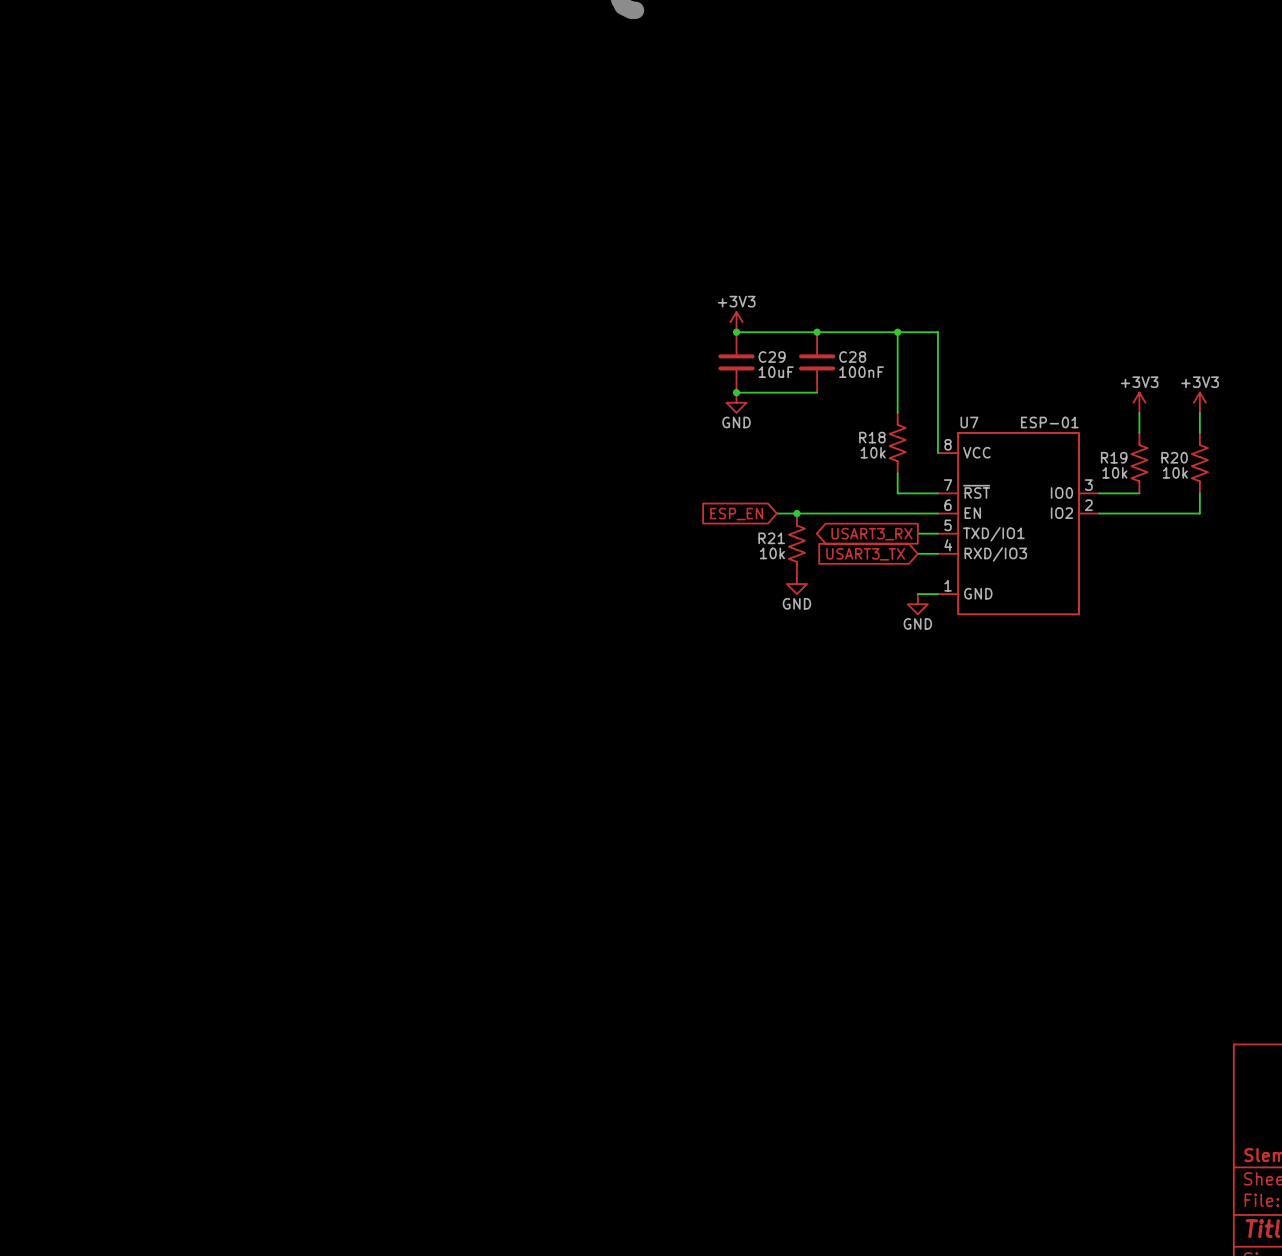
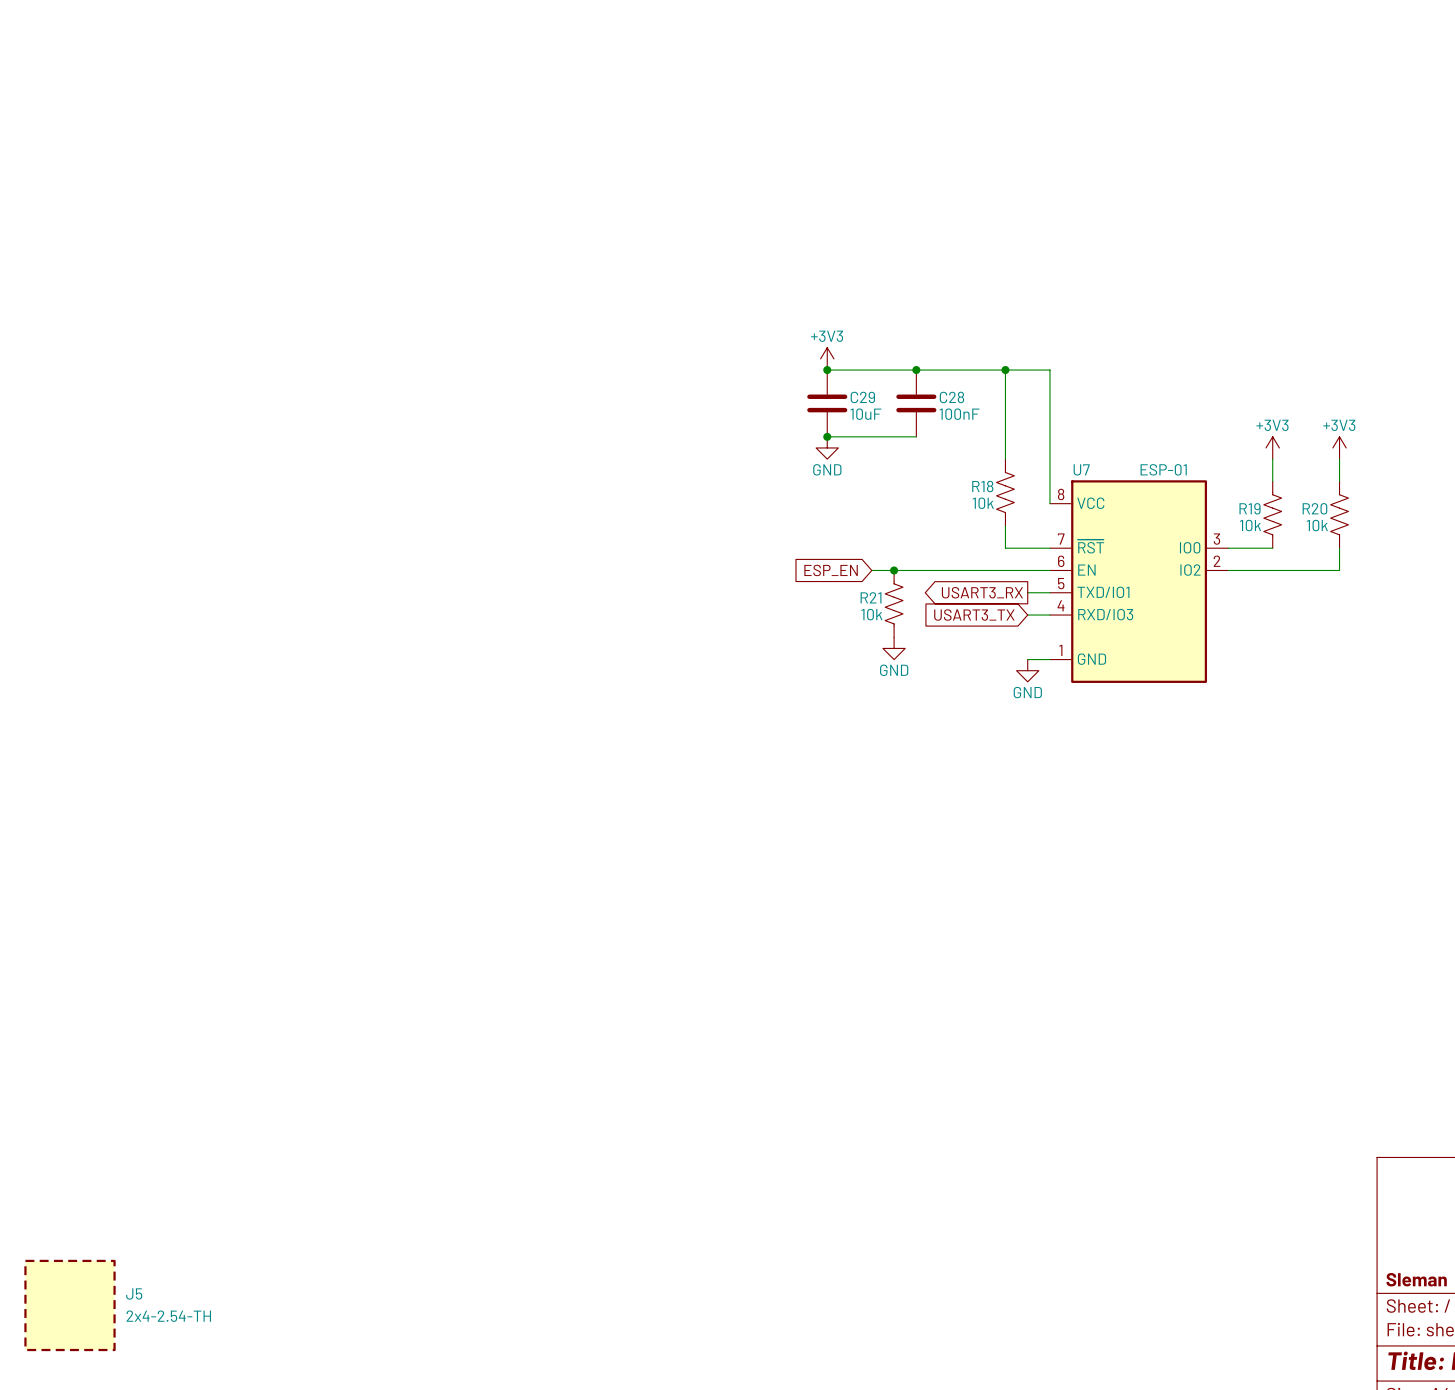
J5: none -> 2x4-2.54-TH (70, 1305)

